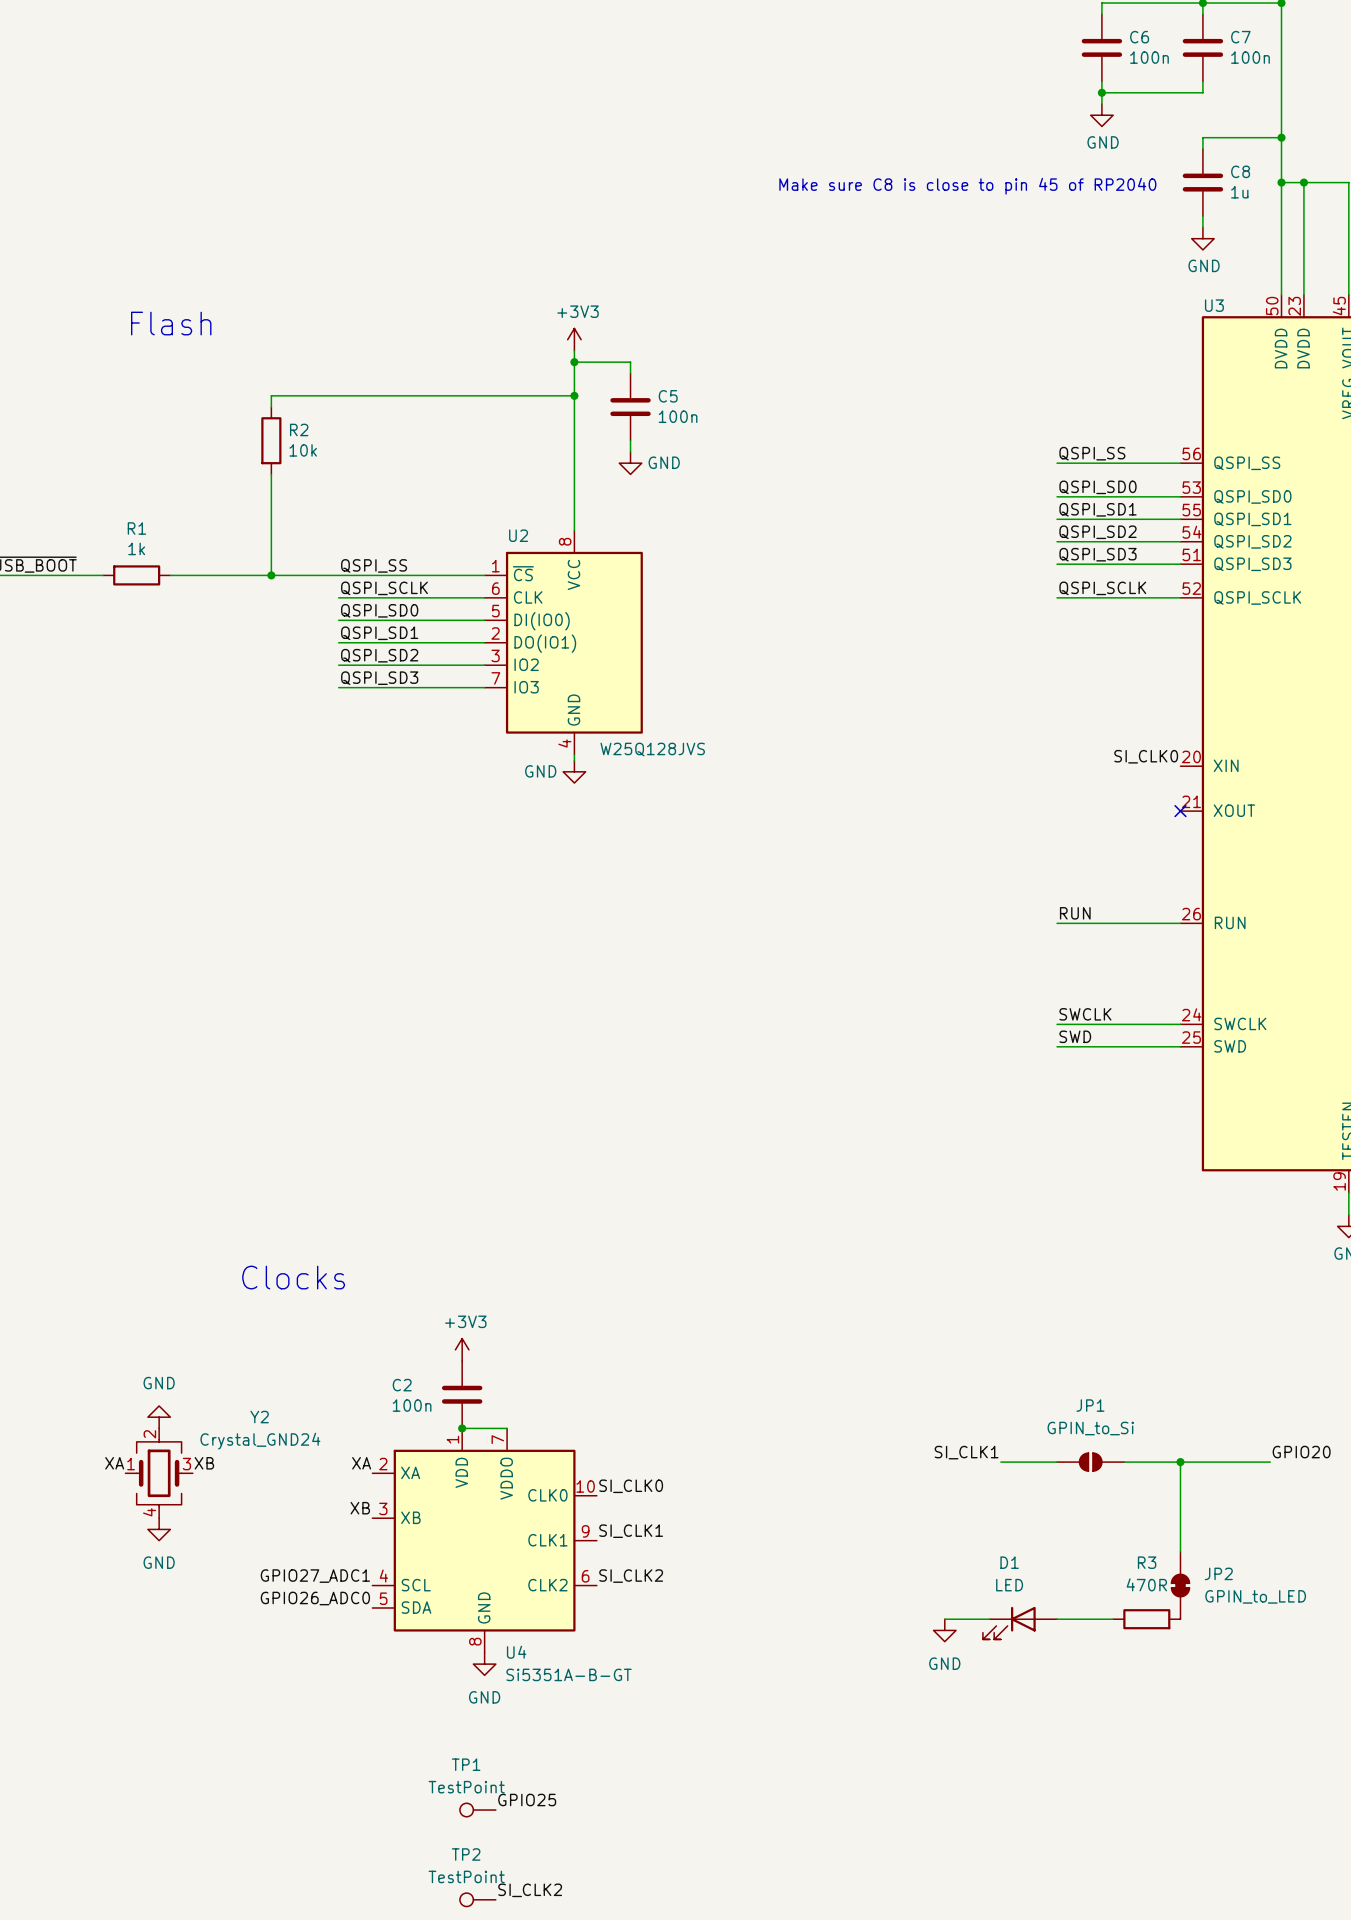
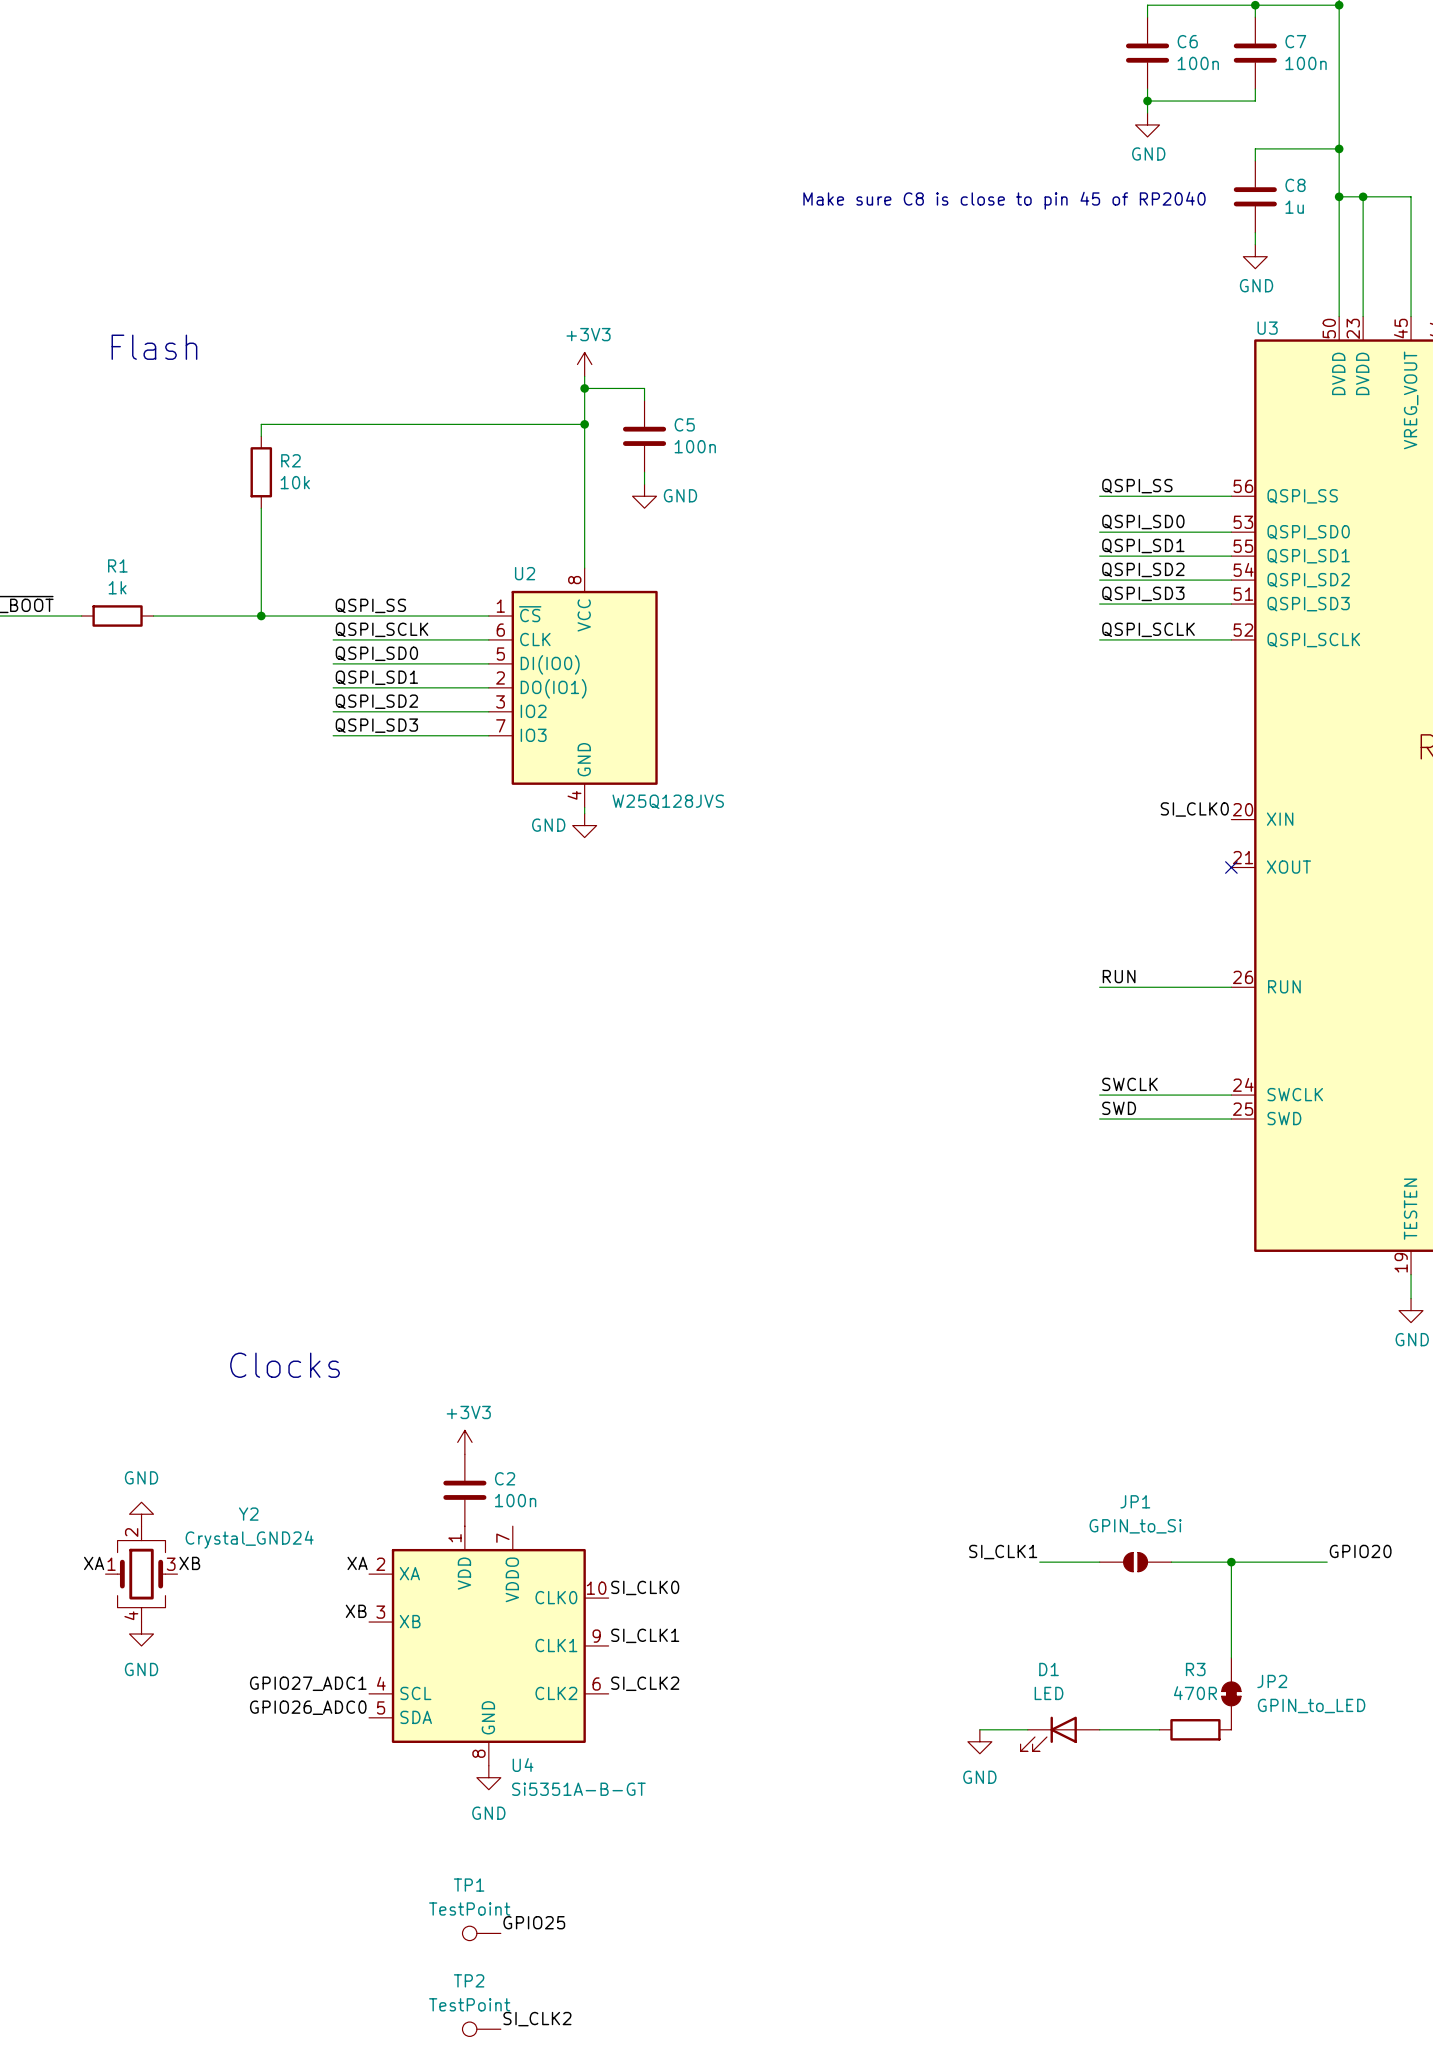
C2 name position: C2 (402, 1385) -> C2 (505, 1478)
C2 value position: 100n (412, 1405) -> 100n (515, 1500)
wire: (462, 1428) (507, 1428) -> none
junction: (462, 1428) -> none

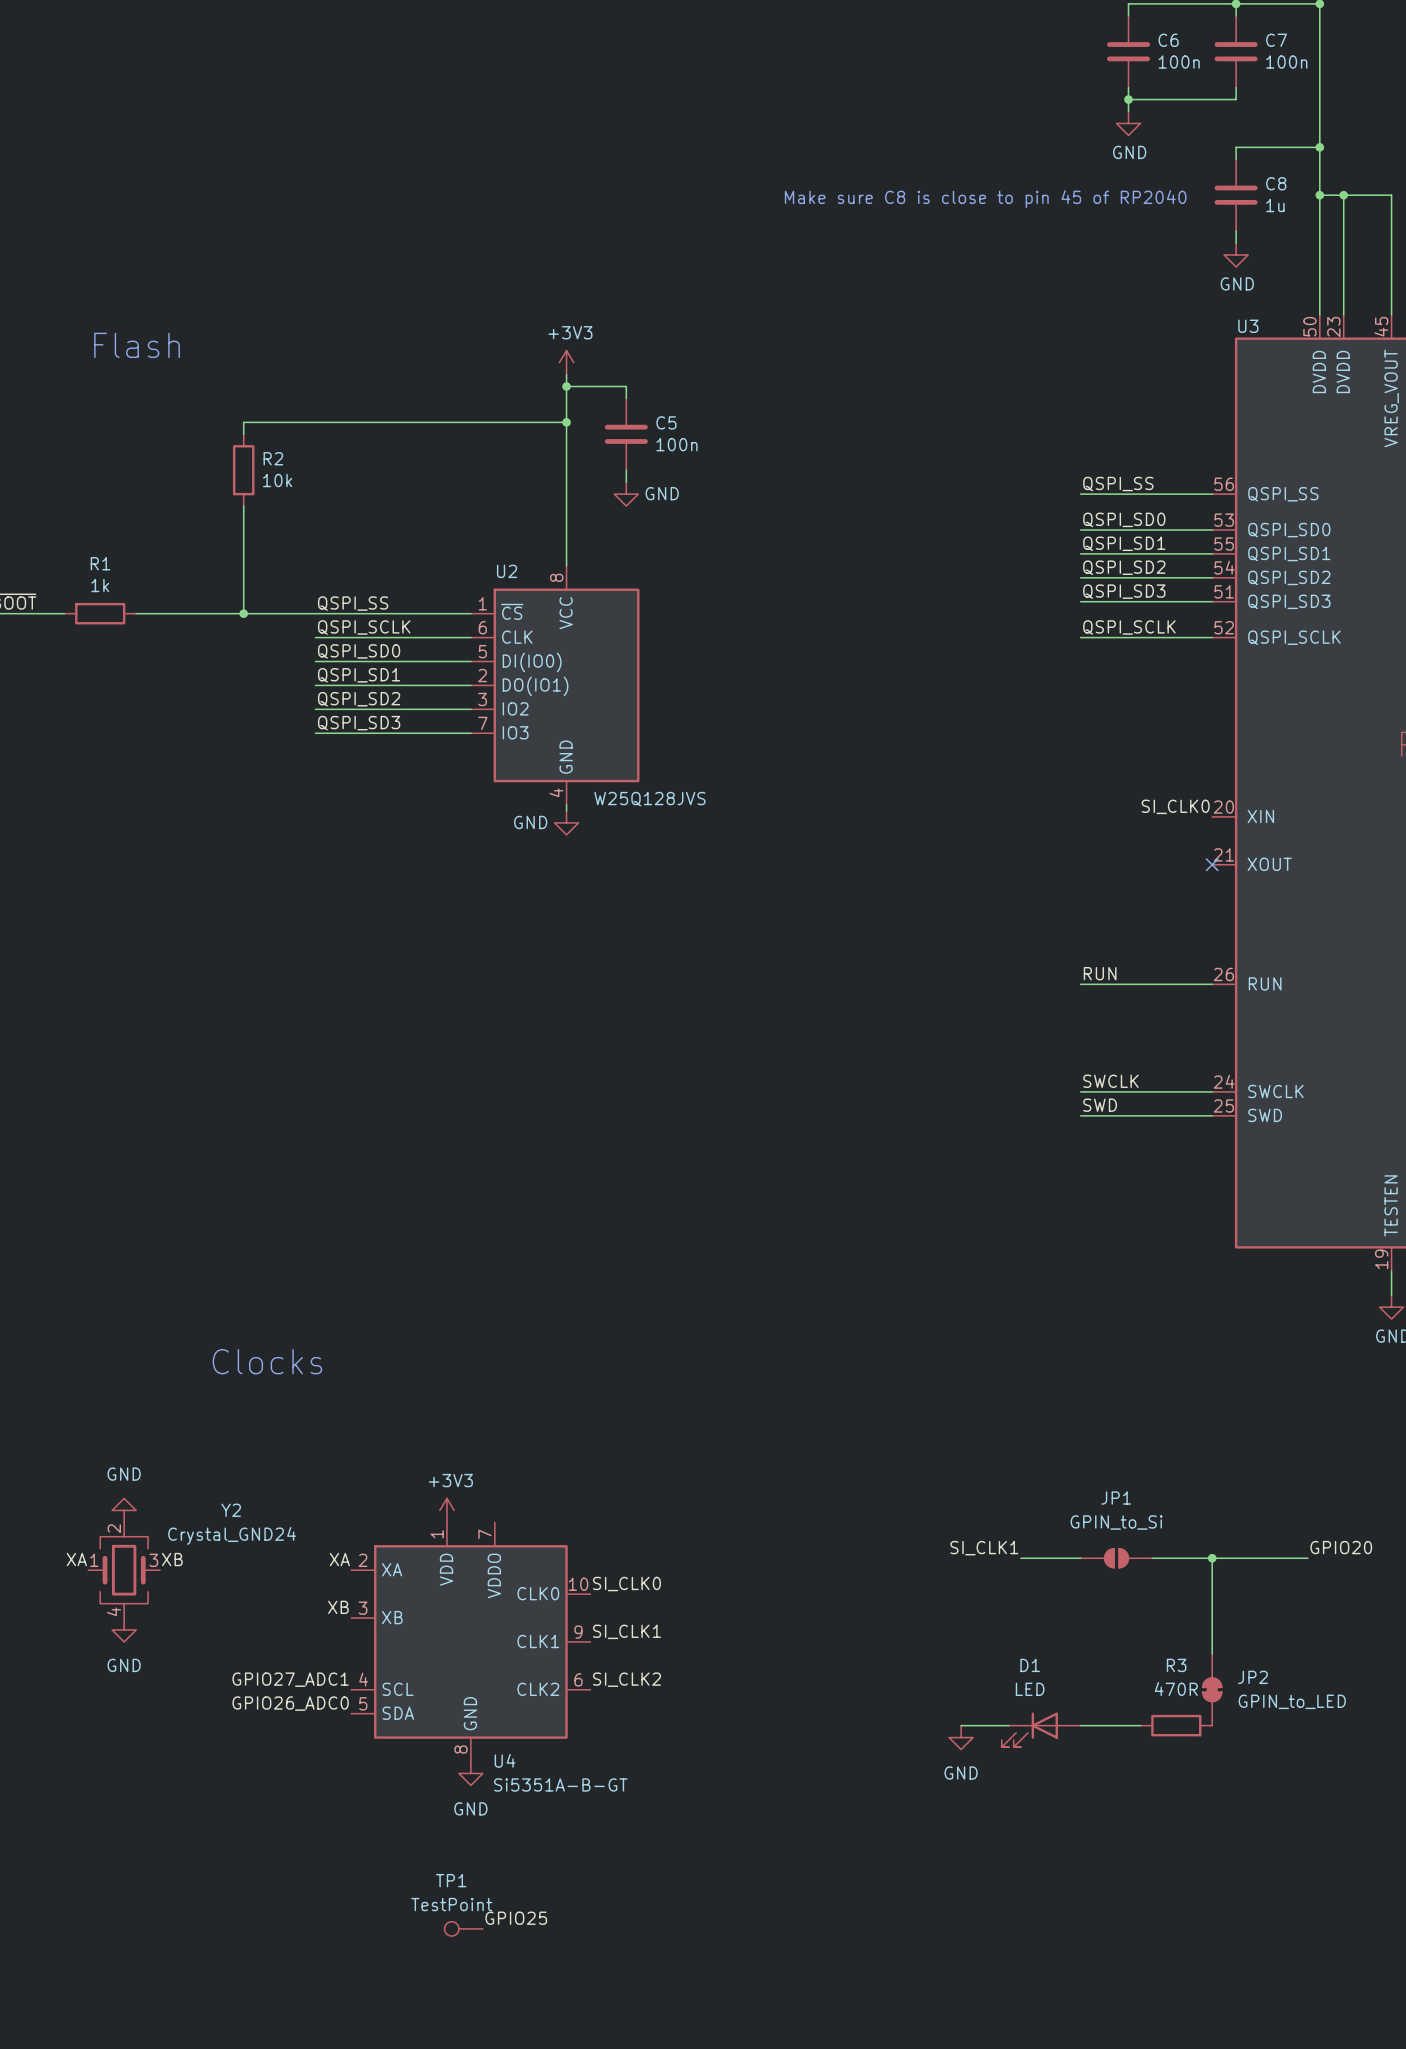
power symbol position: +3V3 (464, 1442) -> +3V3 (446, 1510)
C2: 100n (464, 1490) -> none
label: SI_CLK2 (537, 2019) -> none
TP2: TestPoint (481, 2029) -> none

